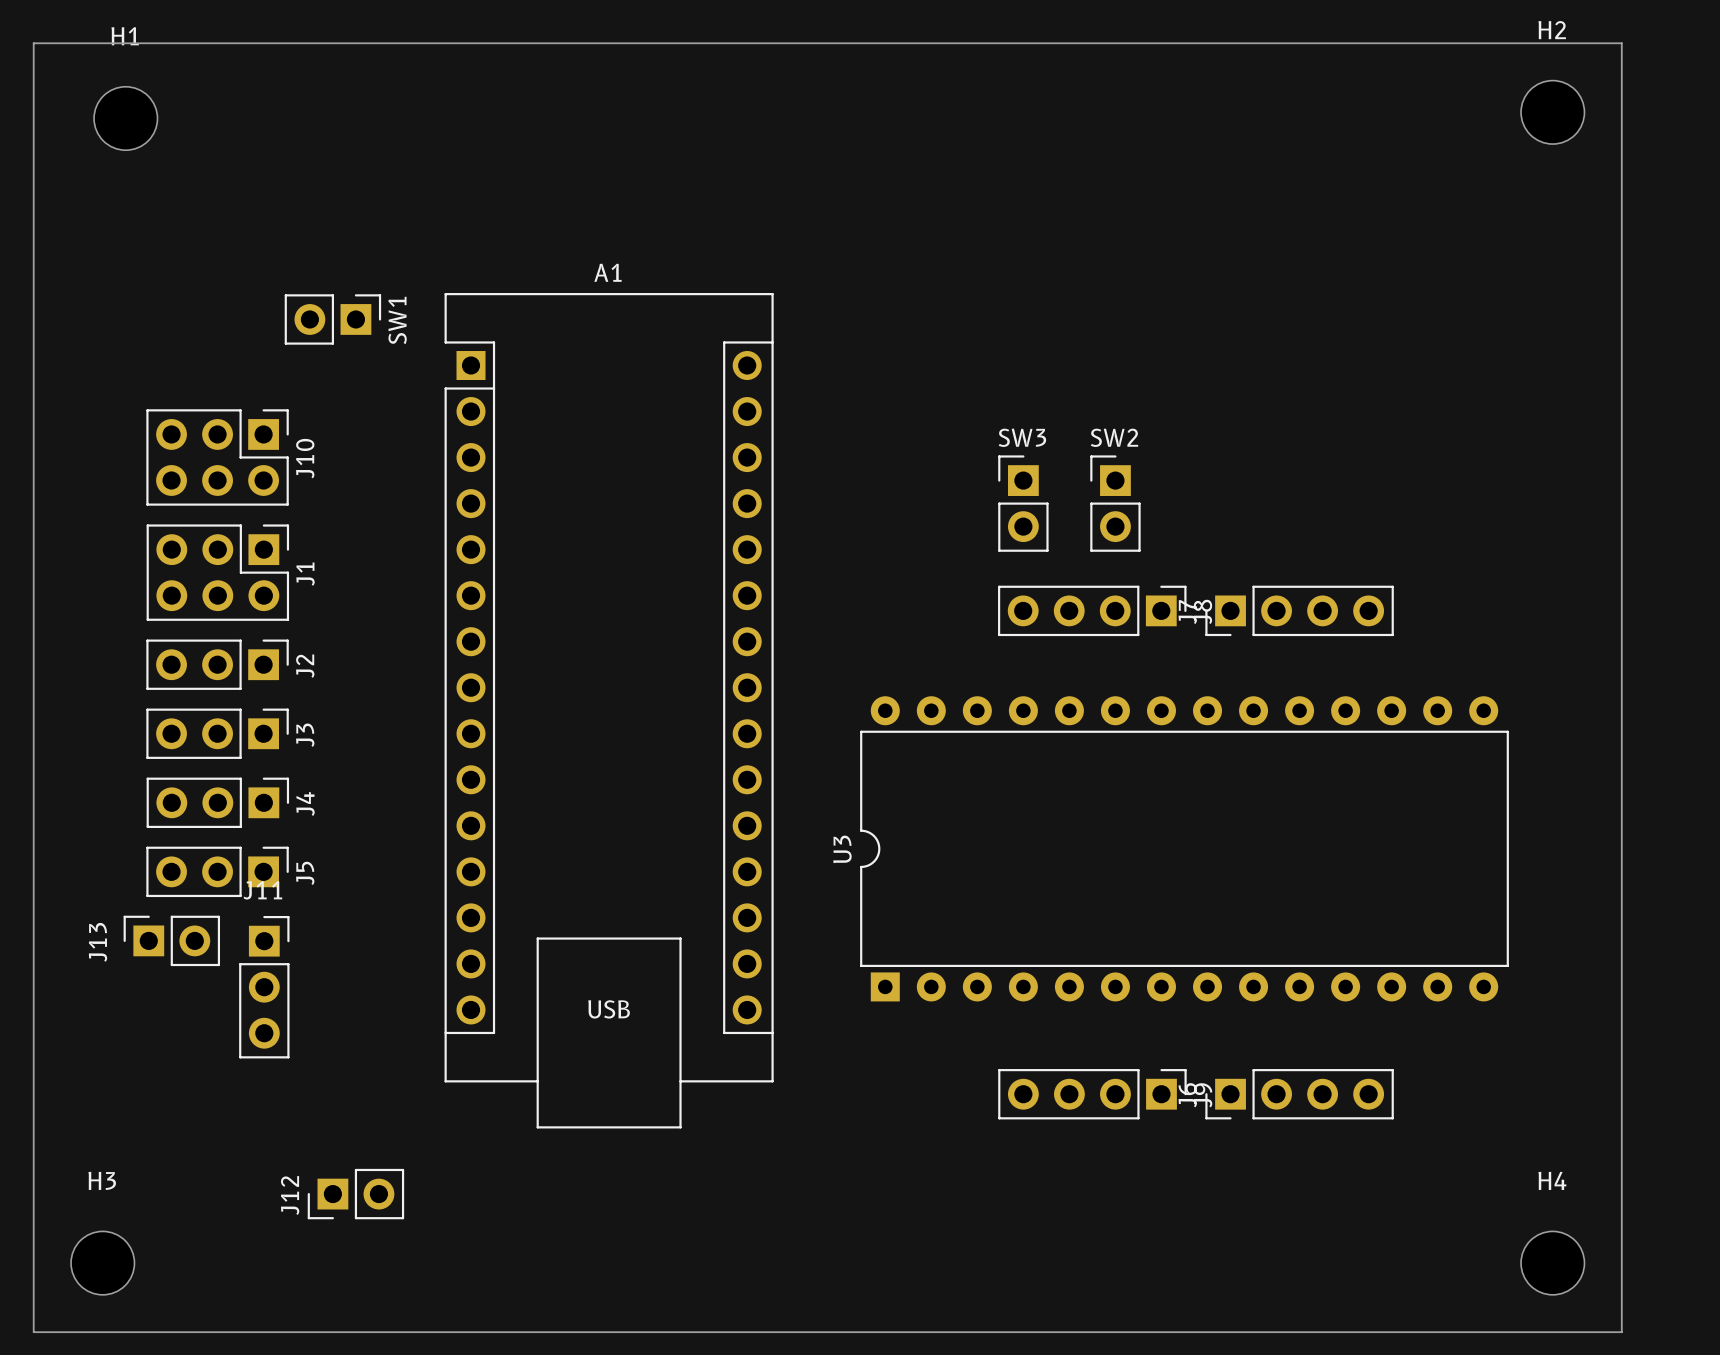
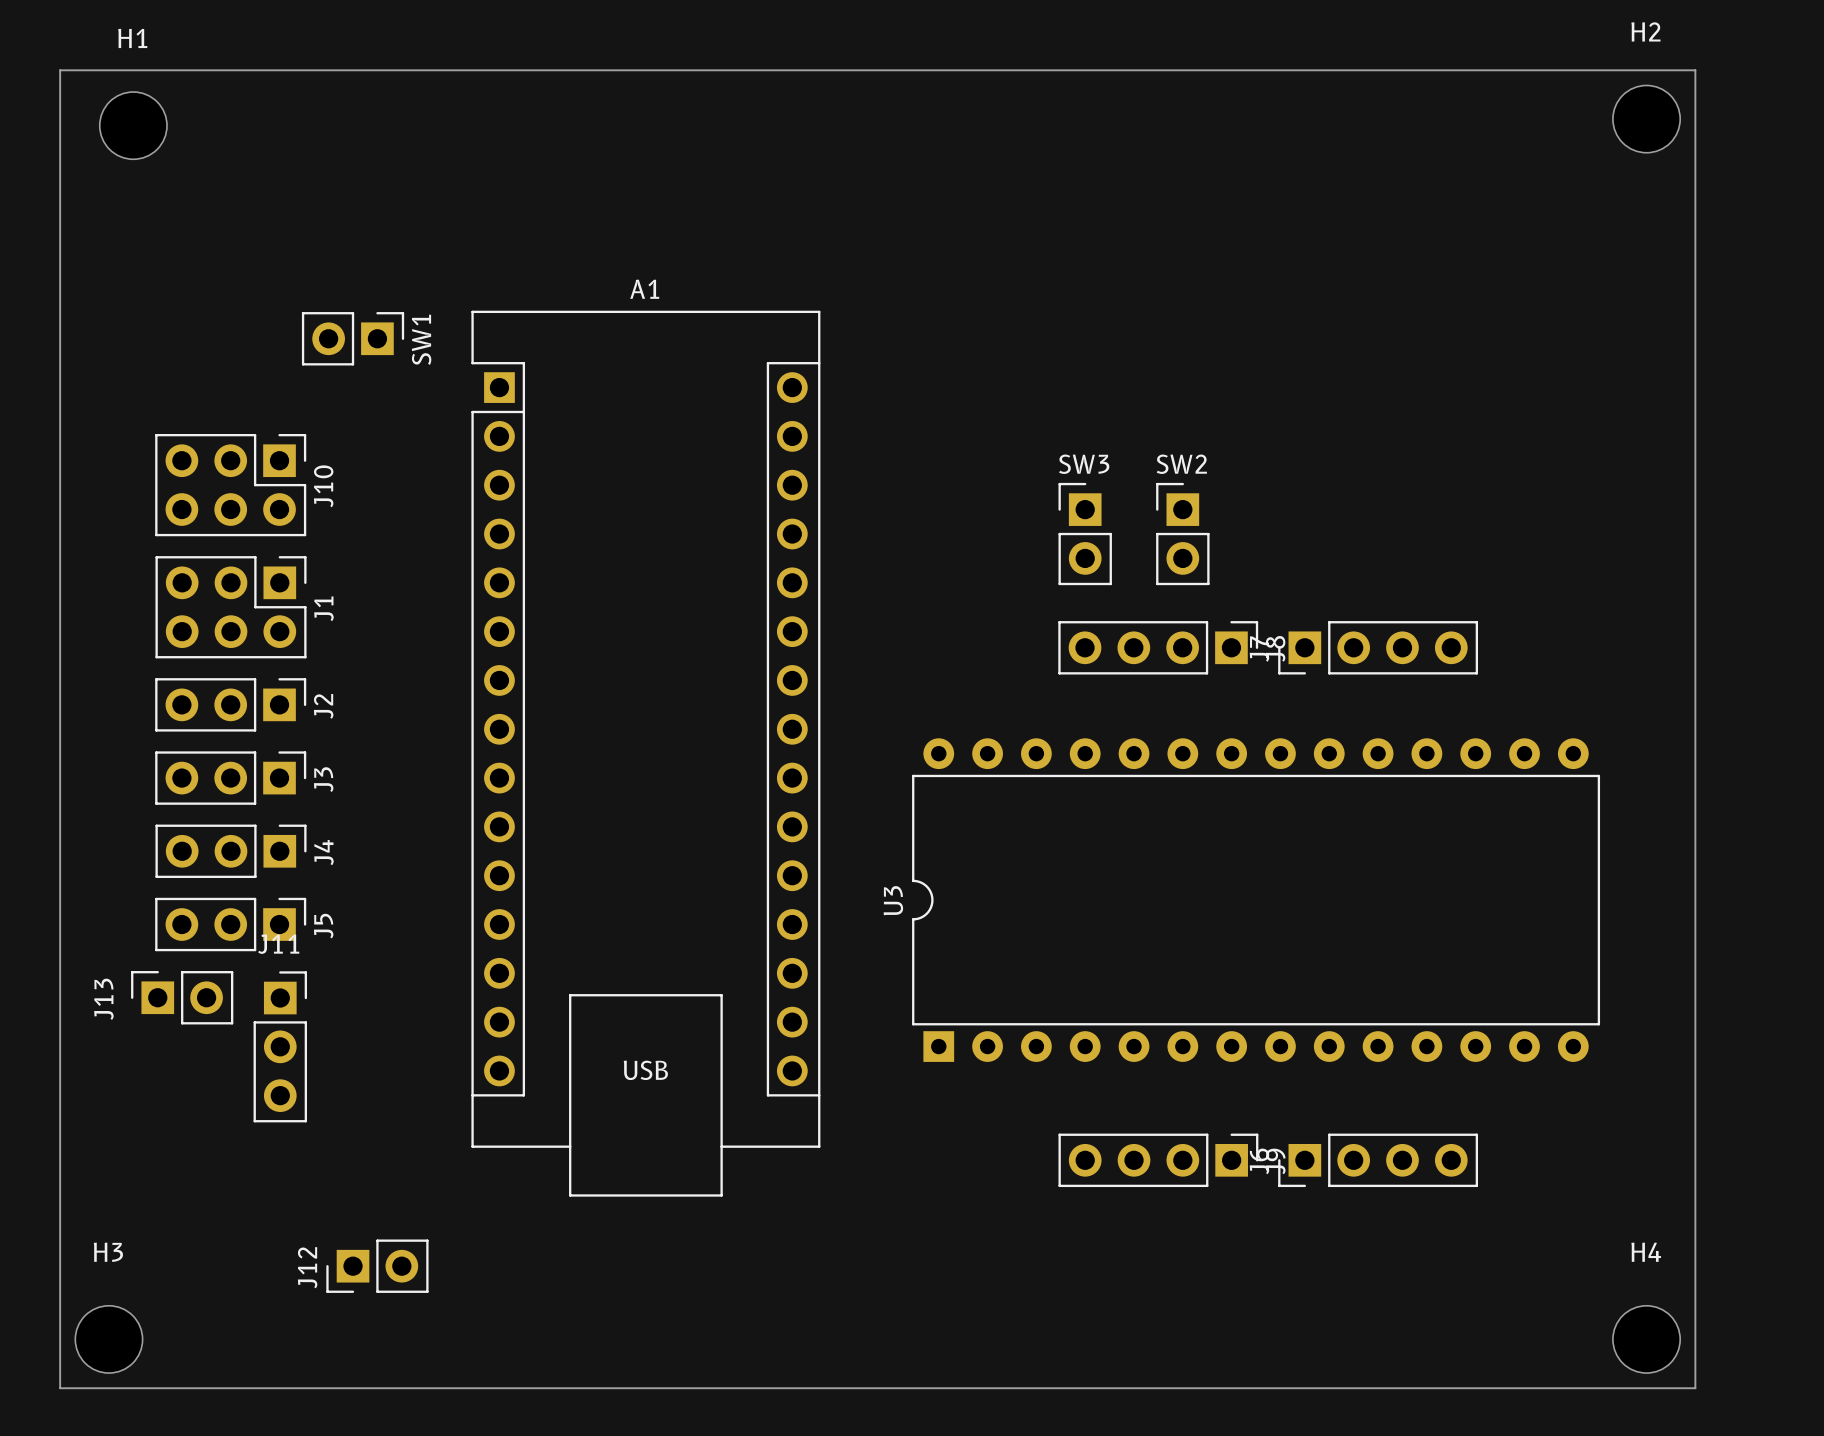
board edge: (33, 43) (1621, 43) (1621, 1332) (33, 1332) (33, 43) -> (60, 70) (60, 1388) (1695, 1388) (1695, 70) (60, 70)

